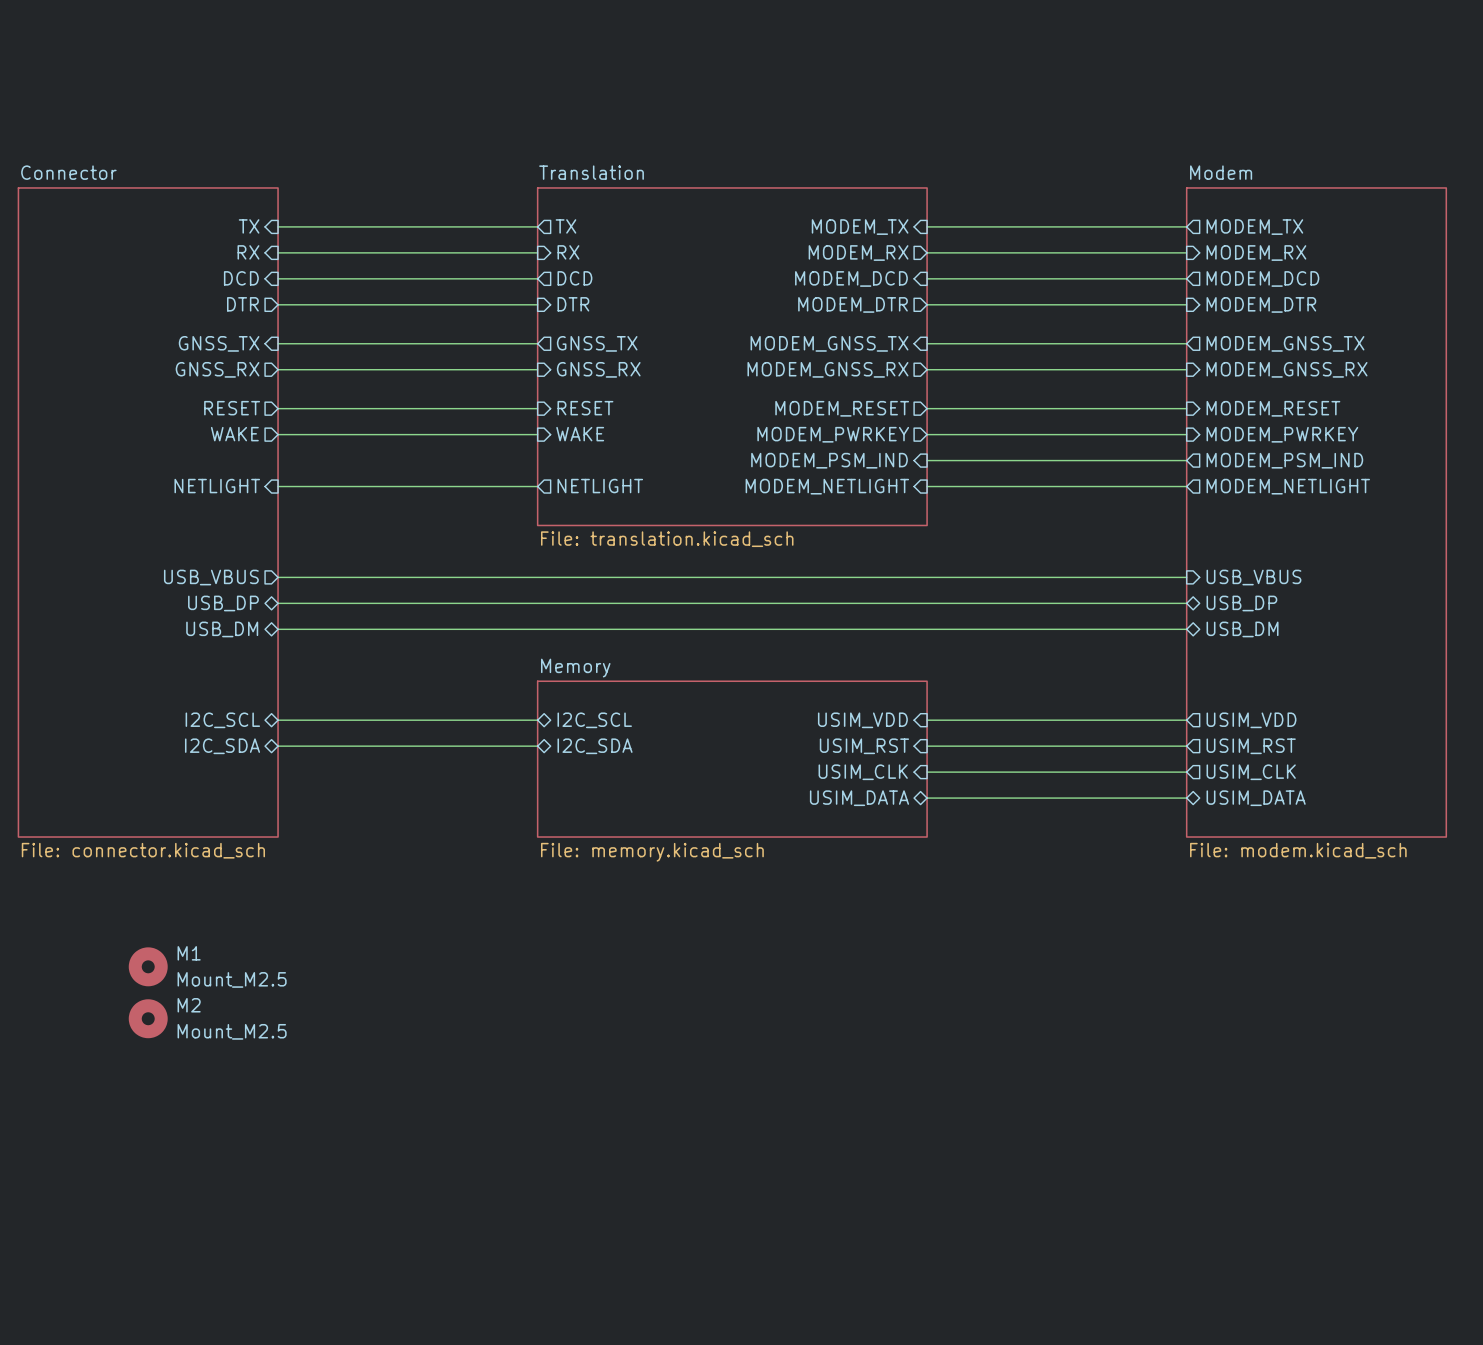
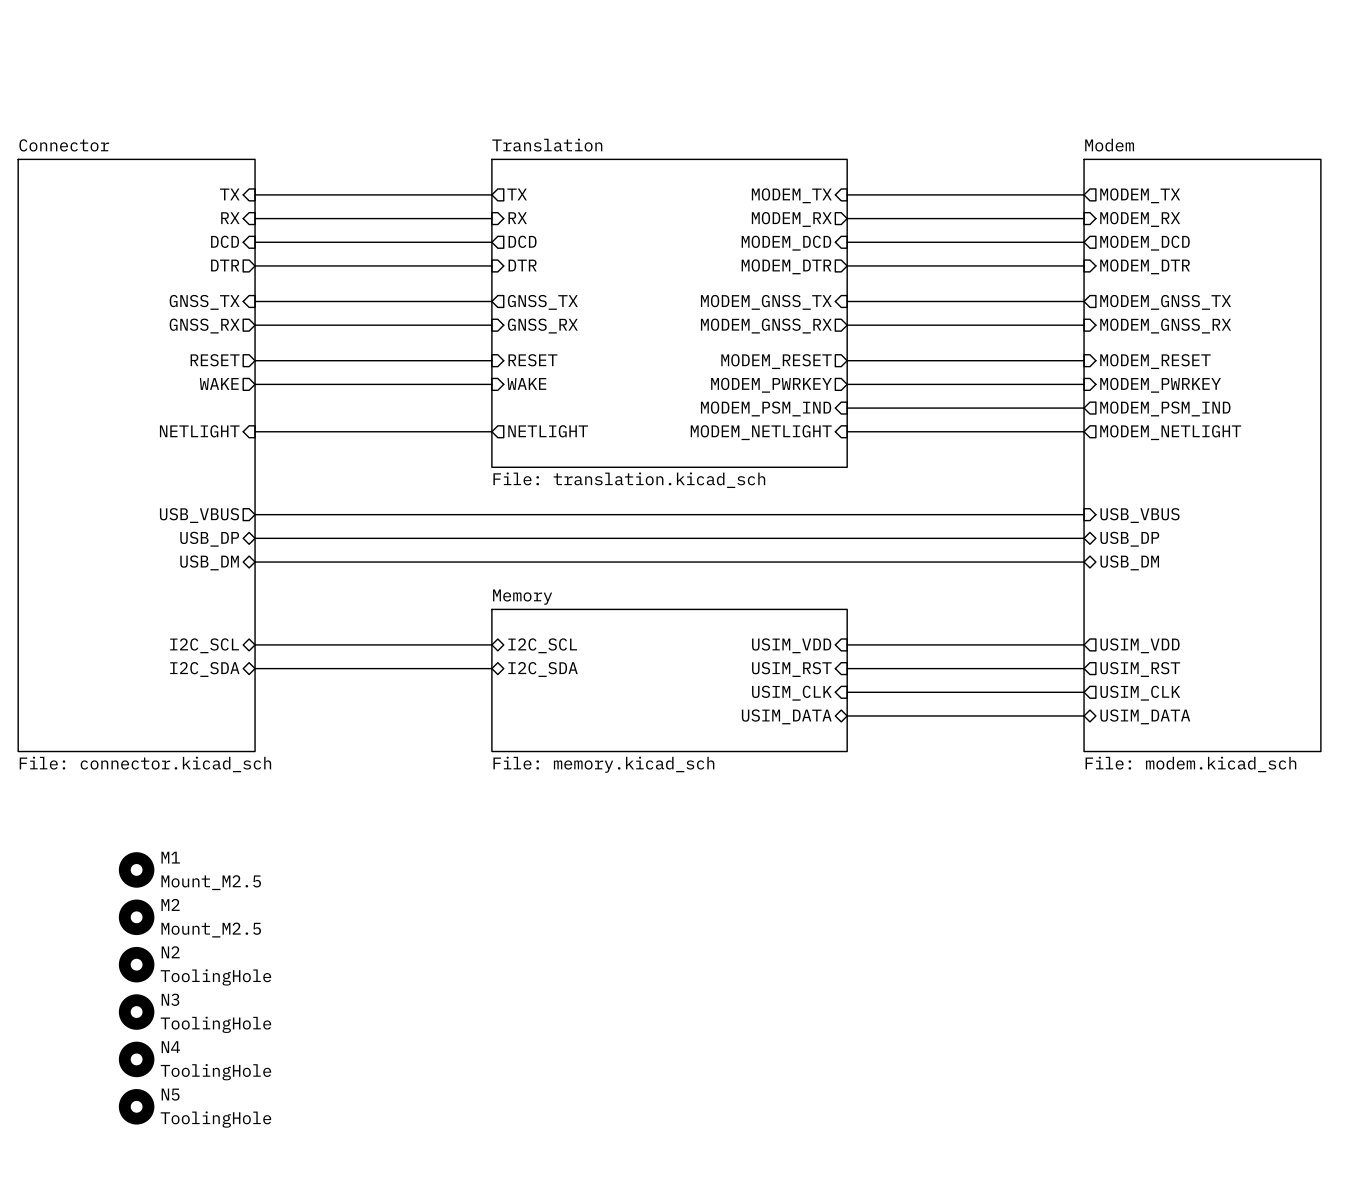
N2: none -> ToolingHole (136, 964)
N3: none -> ToolingHole (136, 1012)
N4: none -> ToolingHole (136, 1059)
N5: none -> ToolingHole (136, 1106)

